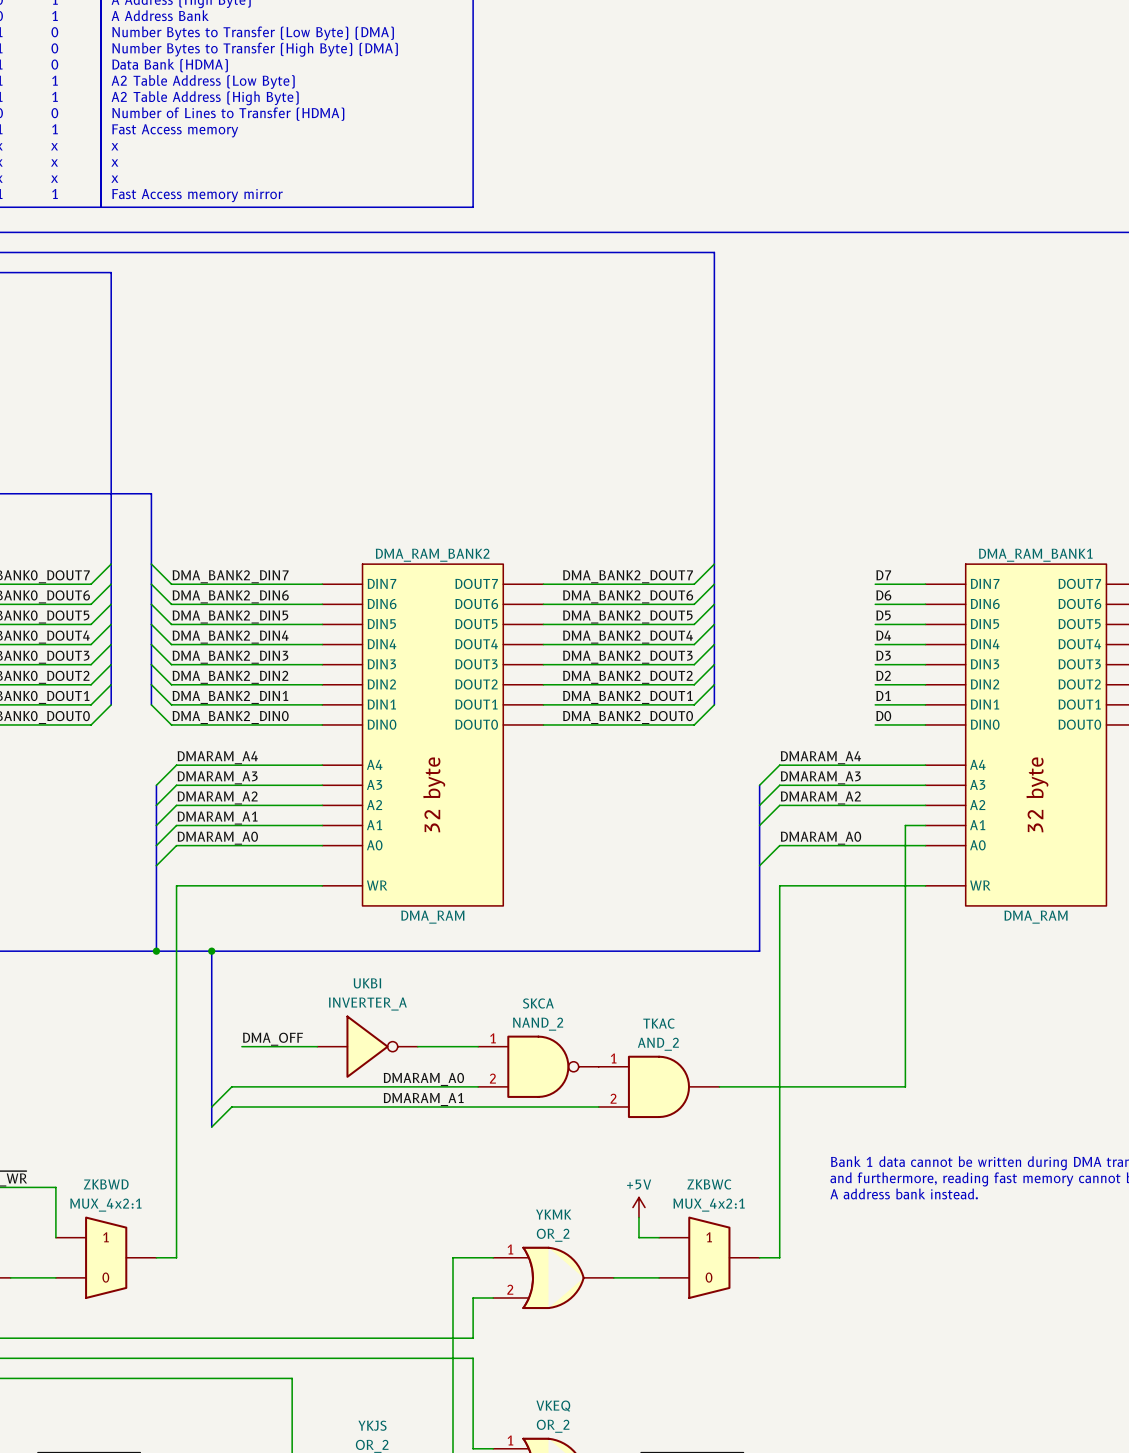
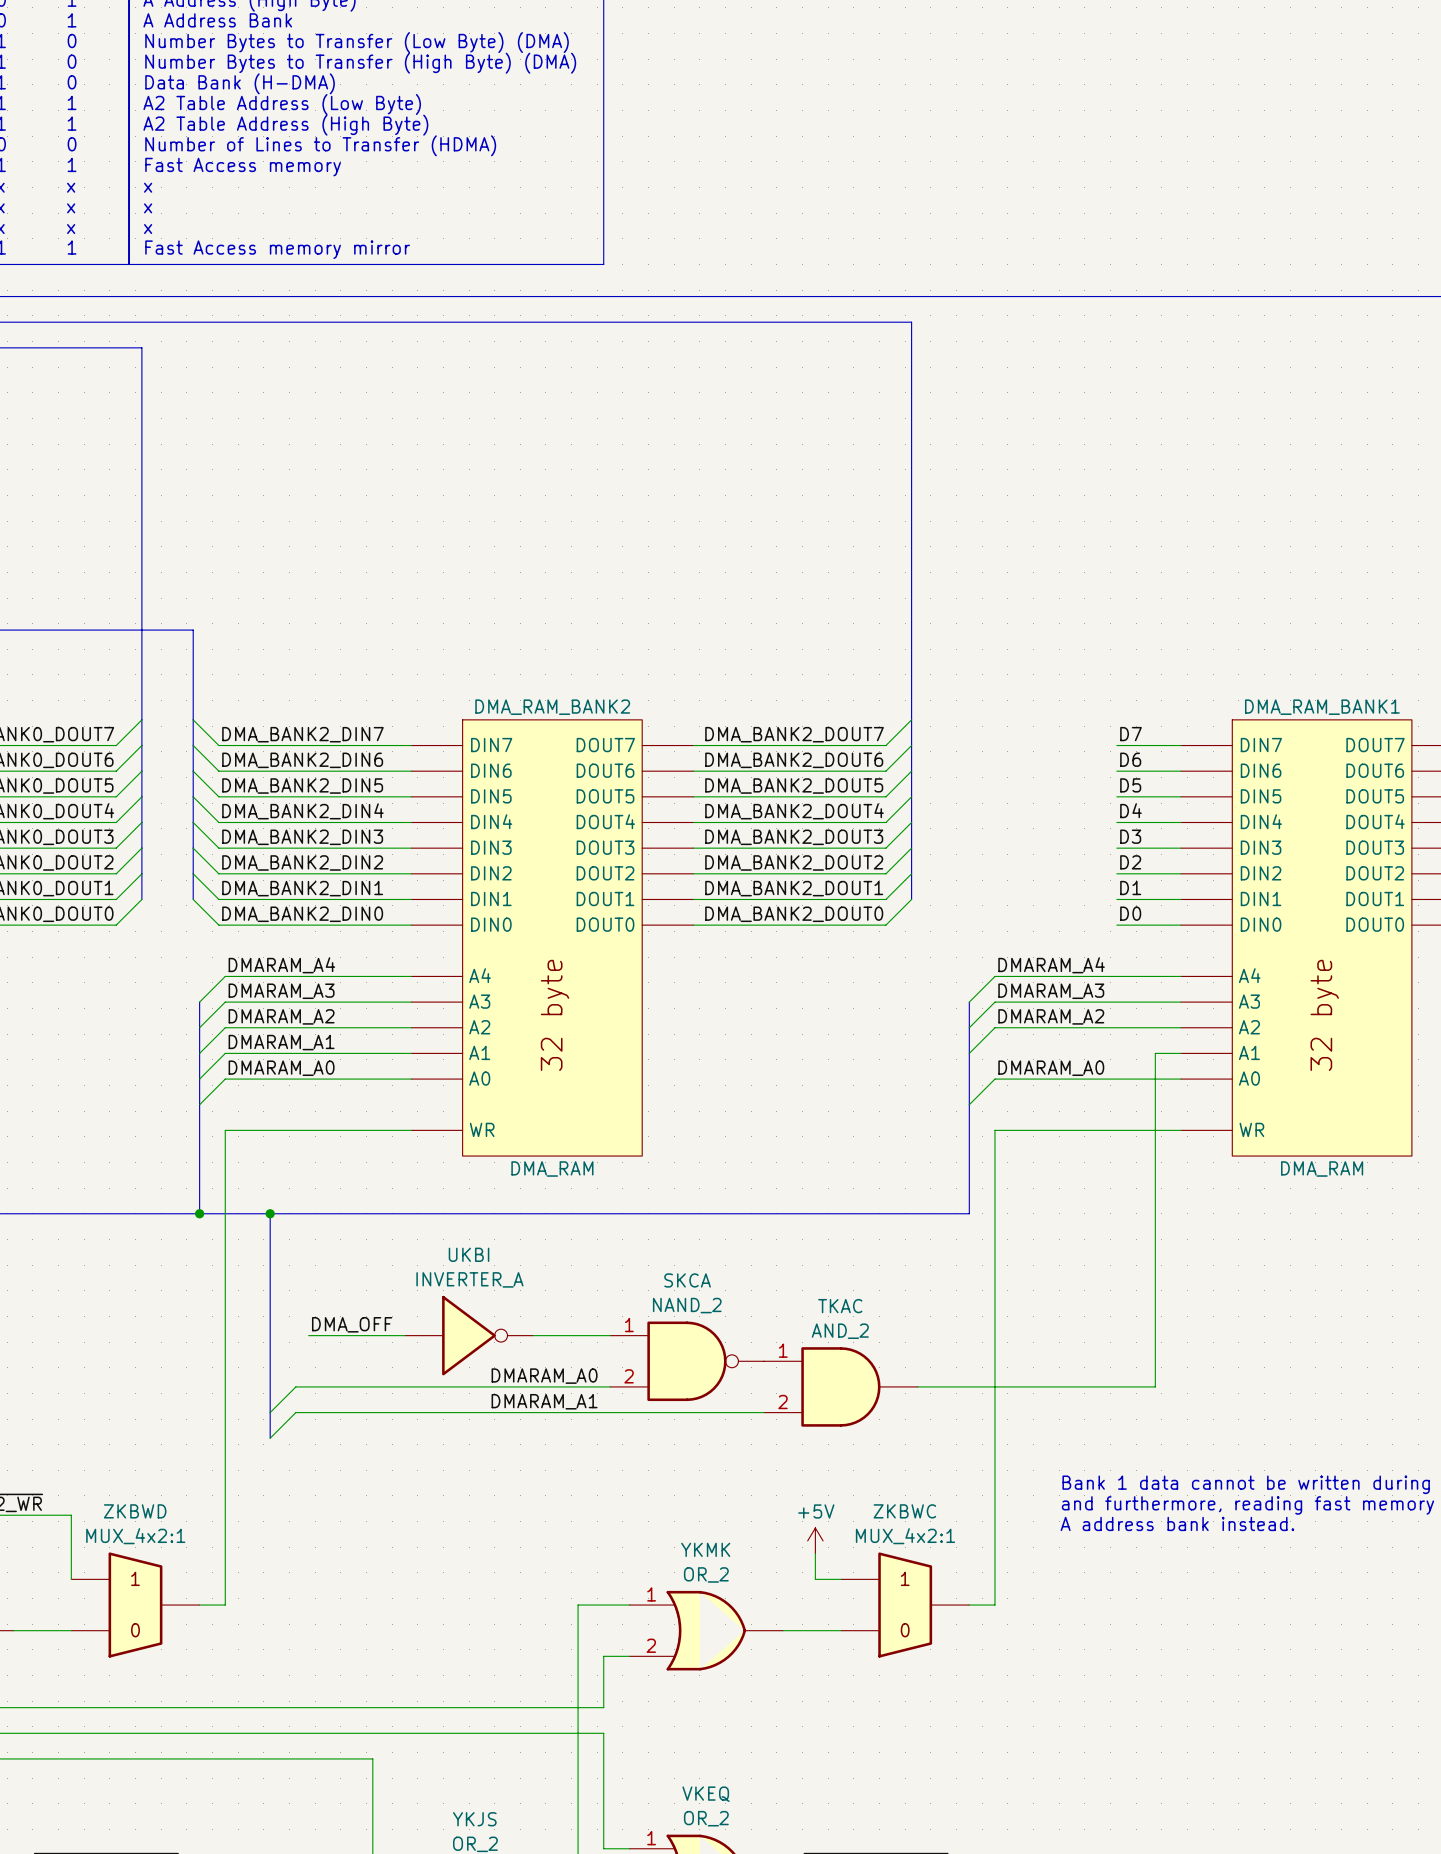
text: Data Bank (HDMA) (170, 65) -> Data Bank (H-DMA) (240, 83)

